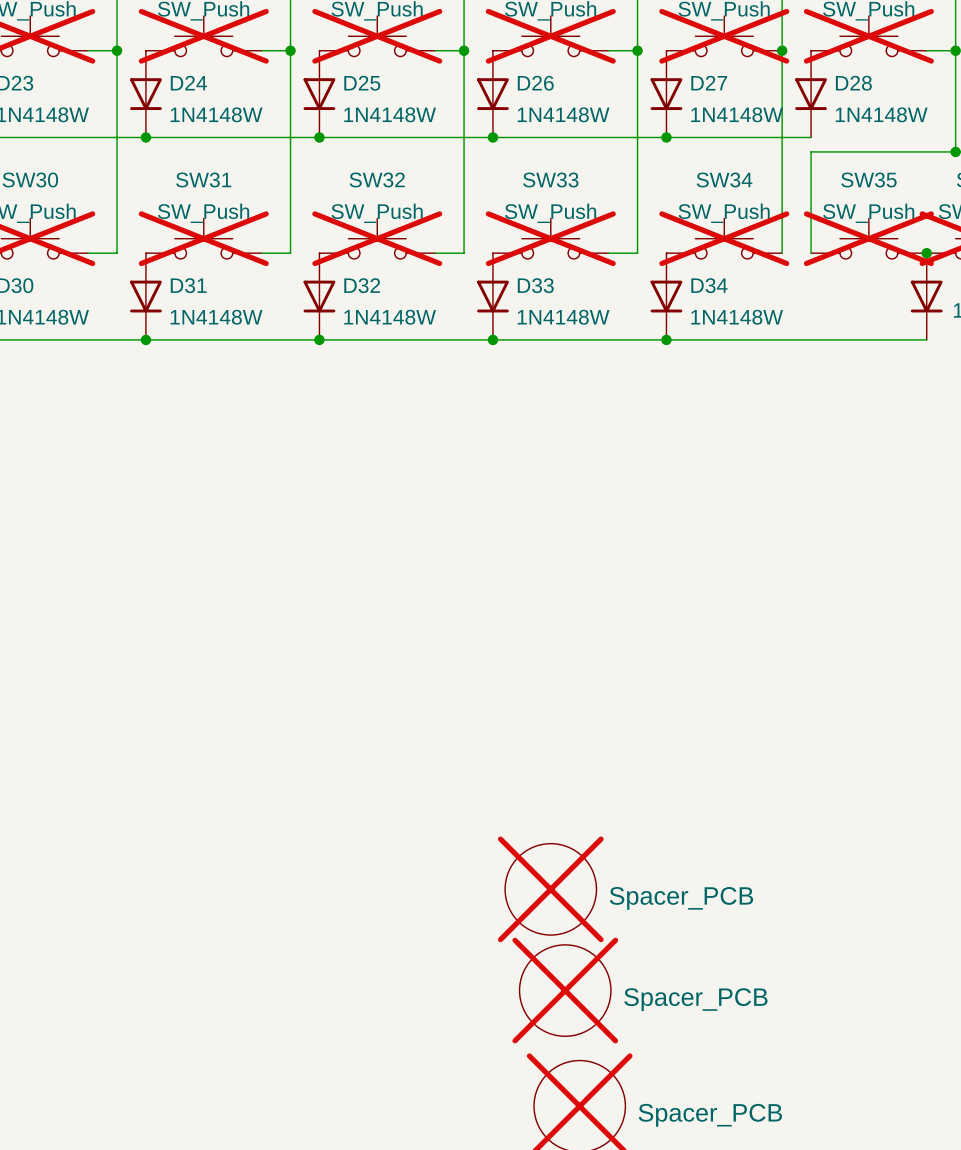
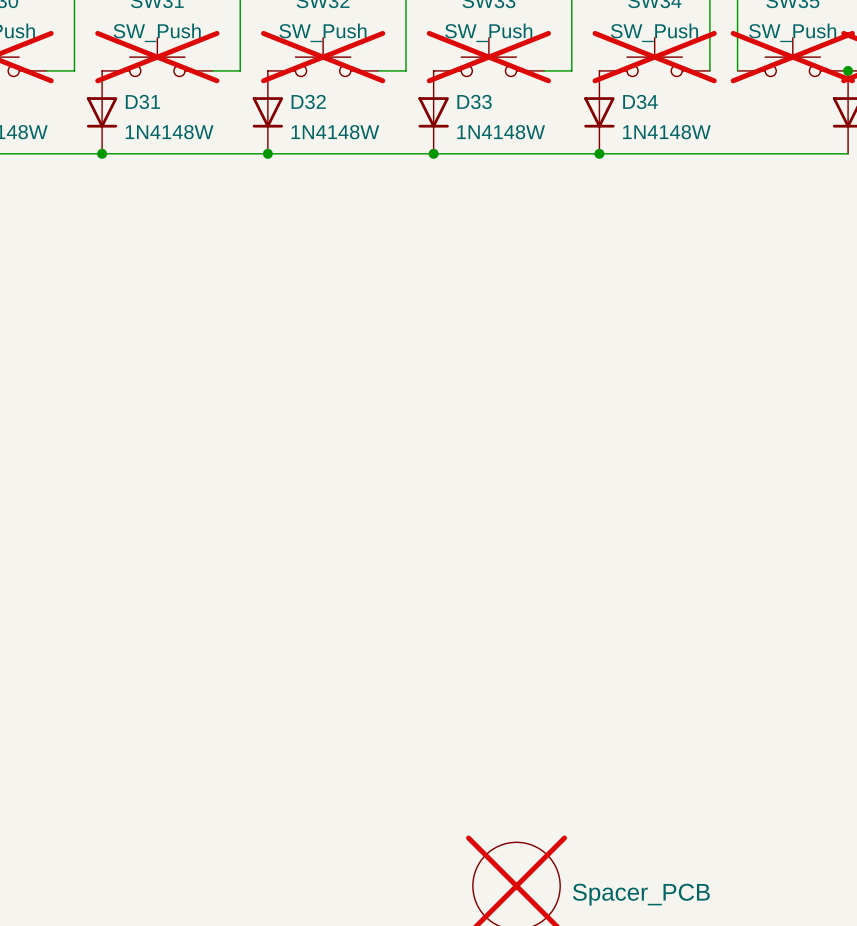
part: Spacer_PCB (550, 889) -> none
part: Spacer_PCB (565, 990) -> none

